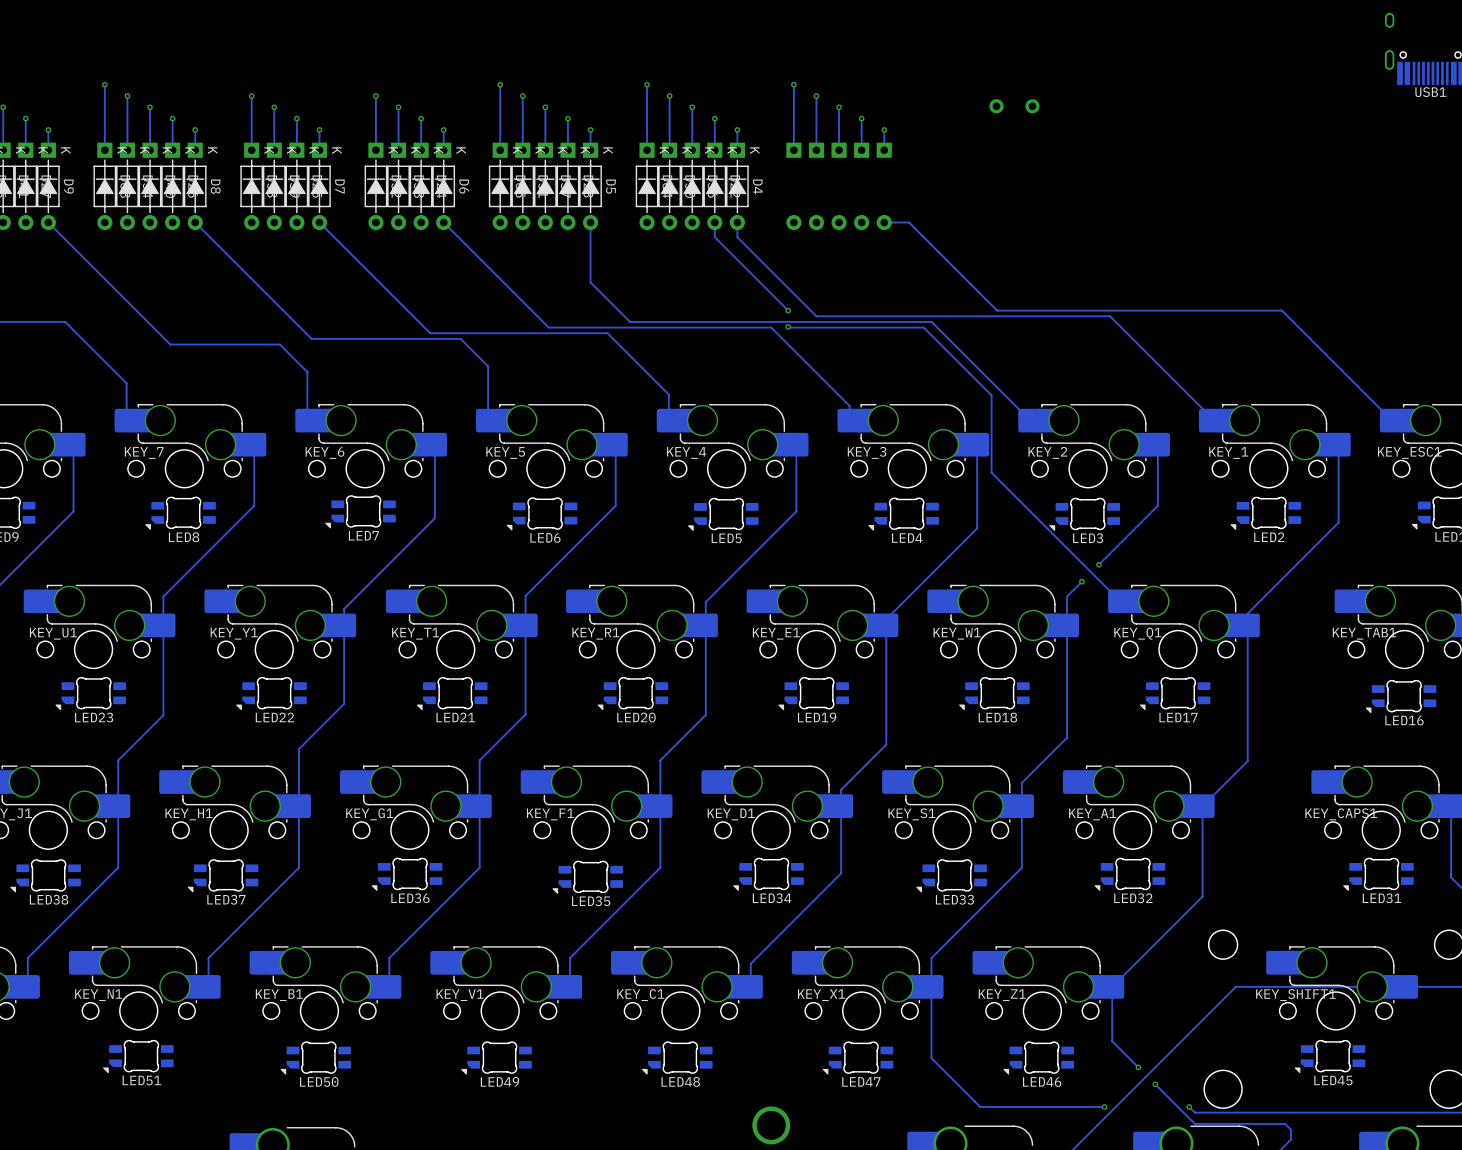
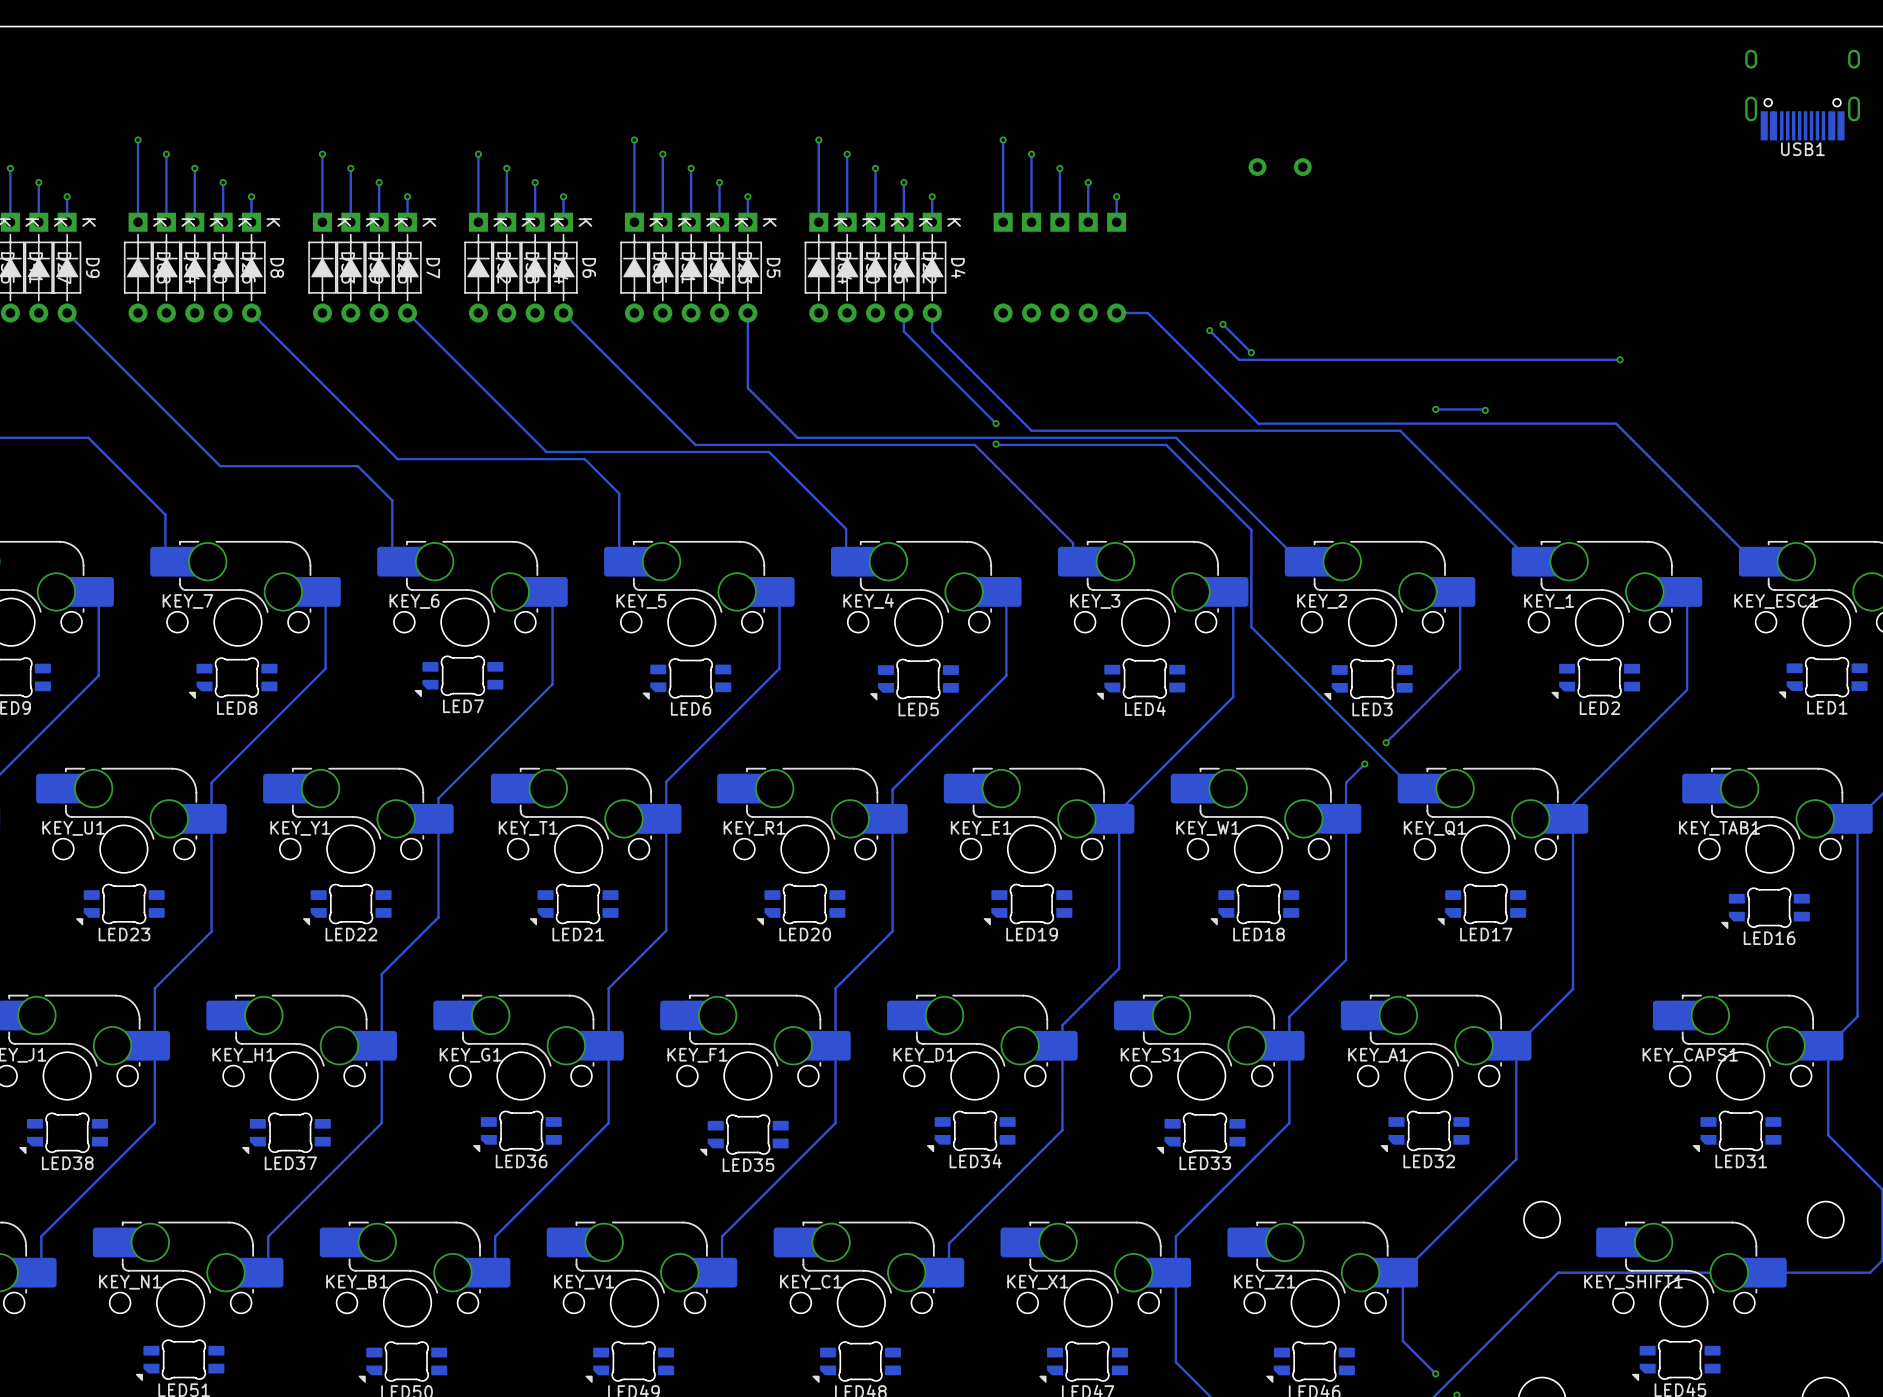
track: none -> (1222, 324) (1251, 352)
via: none -> (1222, 324)
track: none -> (1209, 330) (1238, 359) (1620, 359)
via: none -> (1209, 330)
via: none -> (1251, 352)
via: none -> (1620, 359)
track: none -> (1435, 409) (1485, 410)
via: none -> (1435, 409)
via: none -> (1485, 410)

